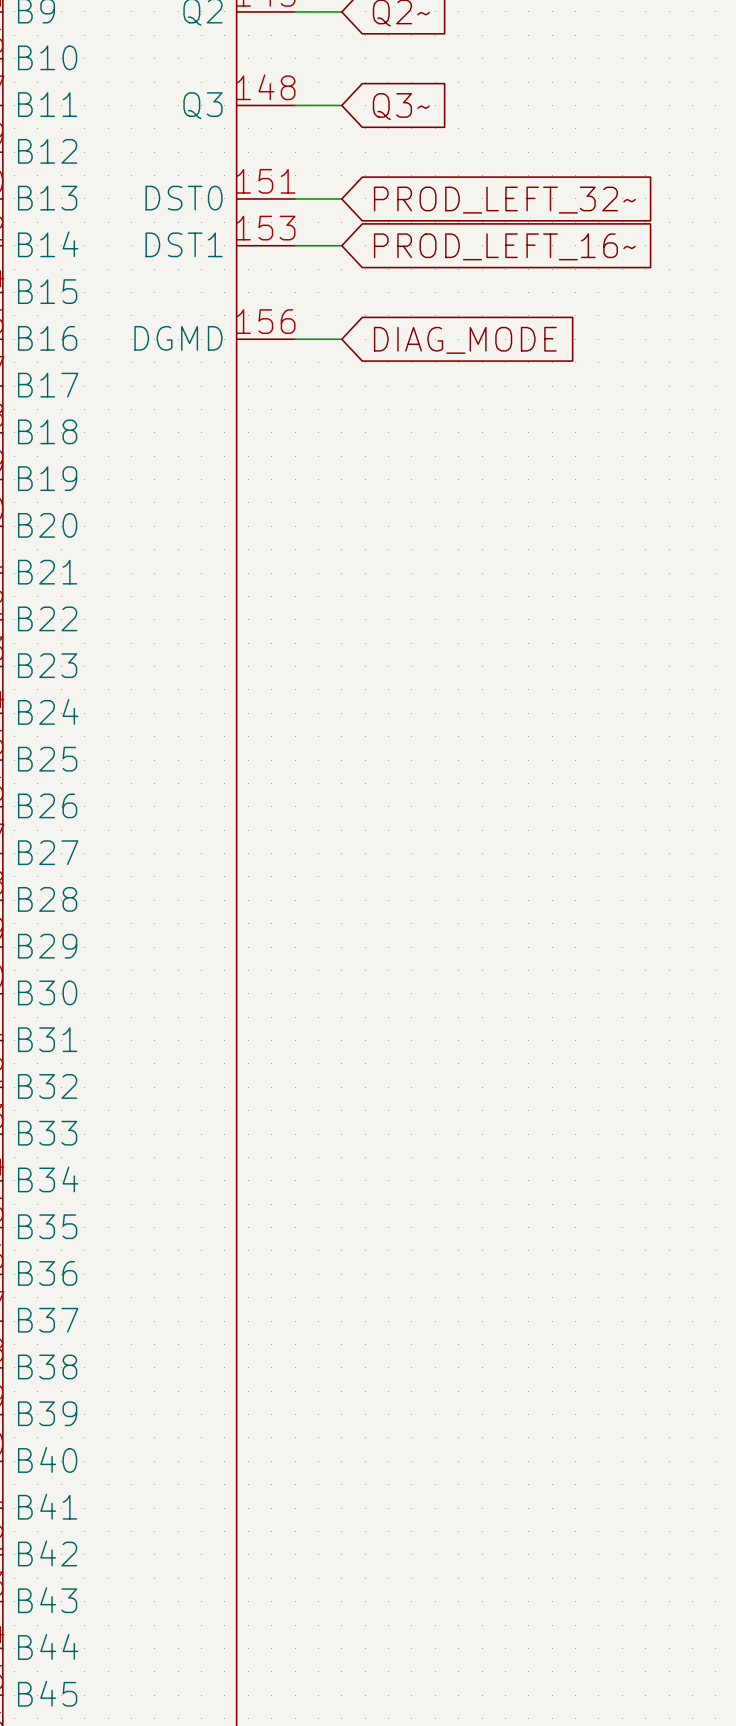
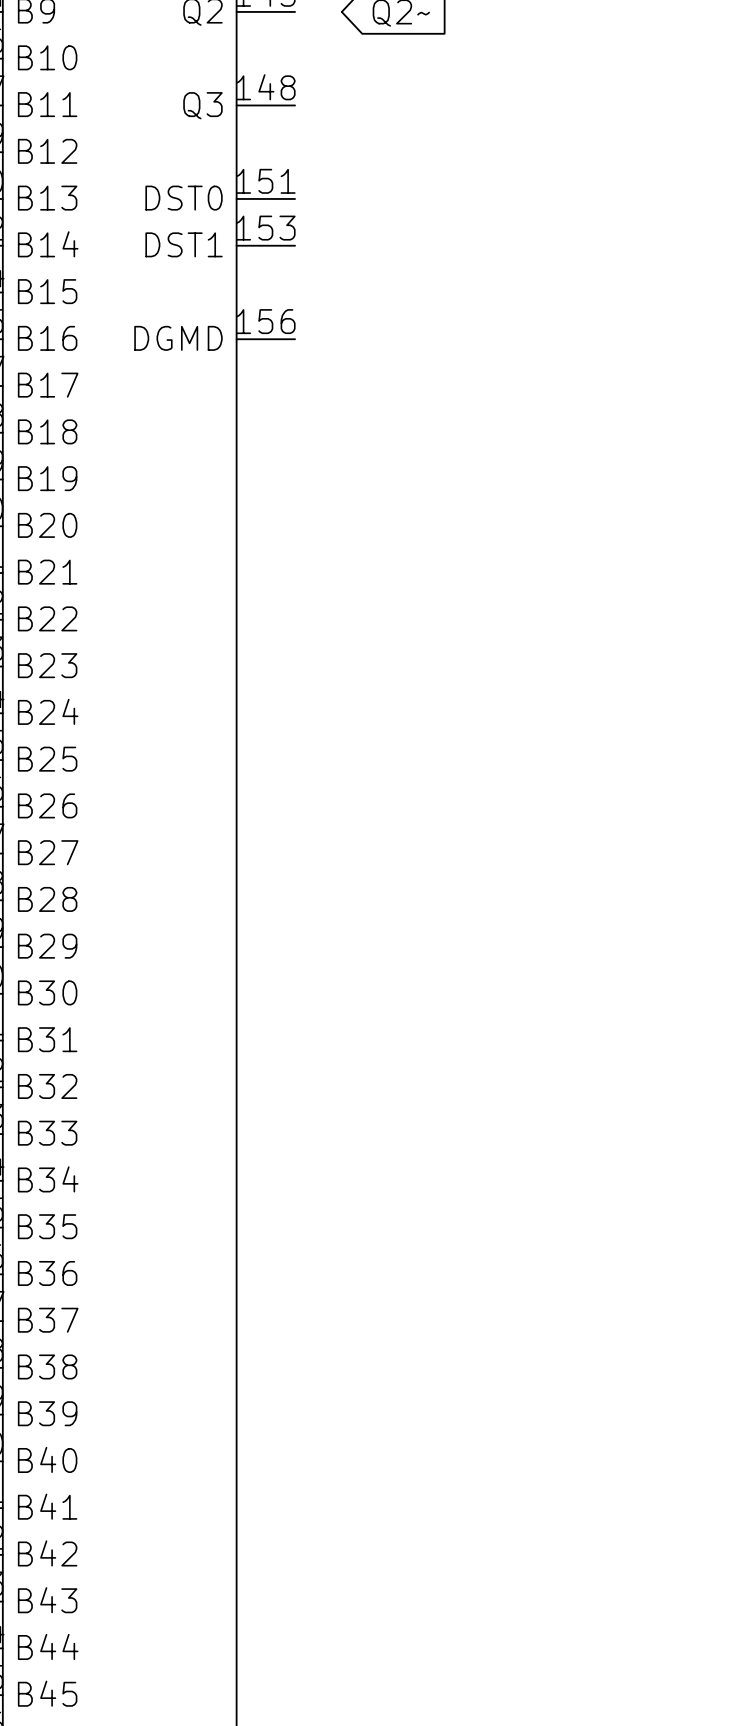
wire: (295, 11) (341, 11) -> none
wire: (295, 105) (341, 105) -> none
global label: Q3~ (401, 106) -> none
wire: (295, 198) (341, 198) -> none
global label: PROD_LEFT_32~ (504, 200) -> none
wire: (295, 245) (341, 245) -> none
global label: PROD_LEFT_16~ (504, 246) -> none
wire: (295, 339) (341, 339) -> none
global label: DIAG_MODE (465, 340) -> none

